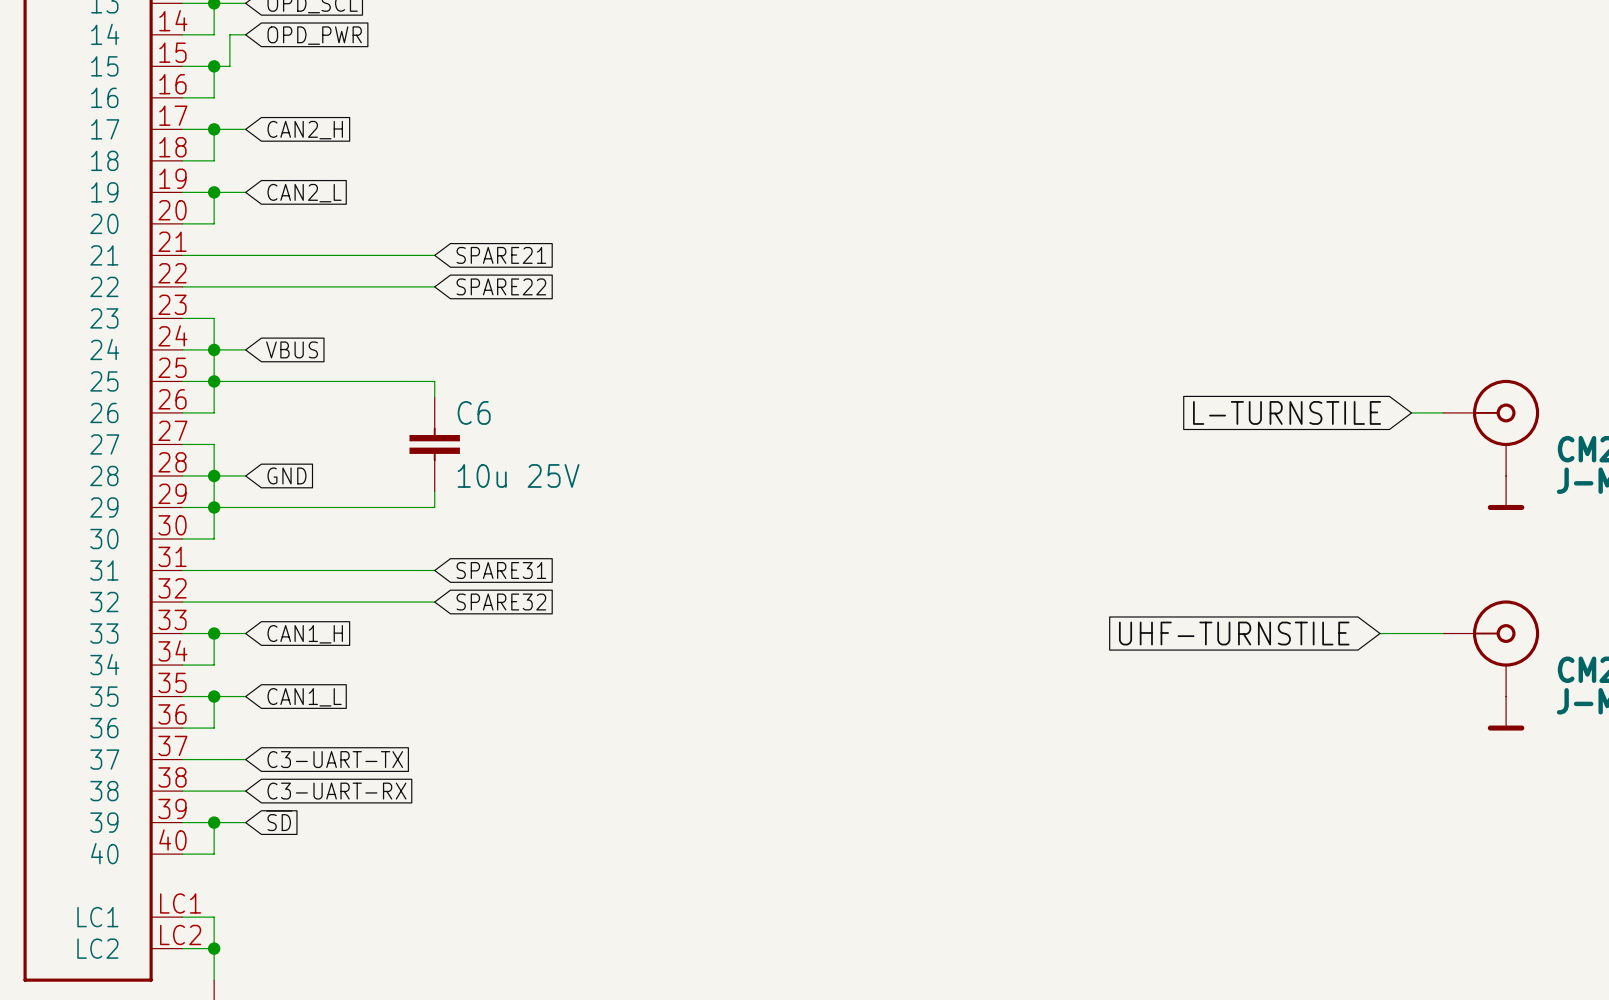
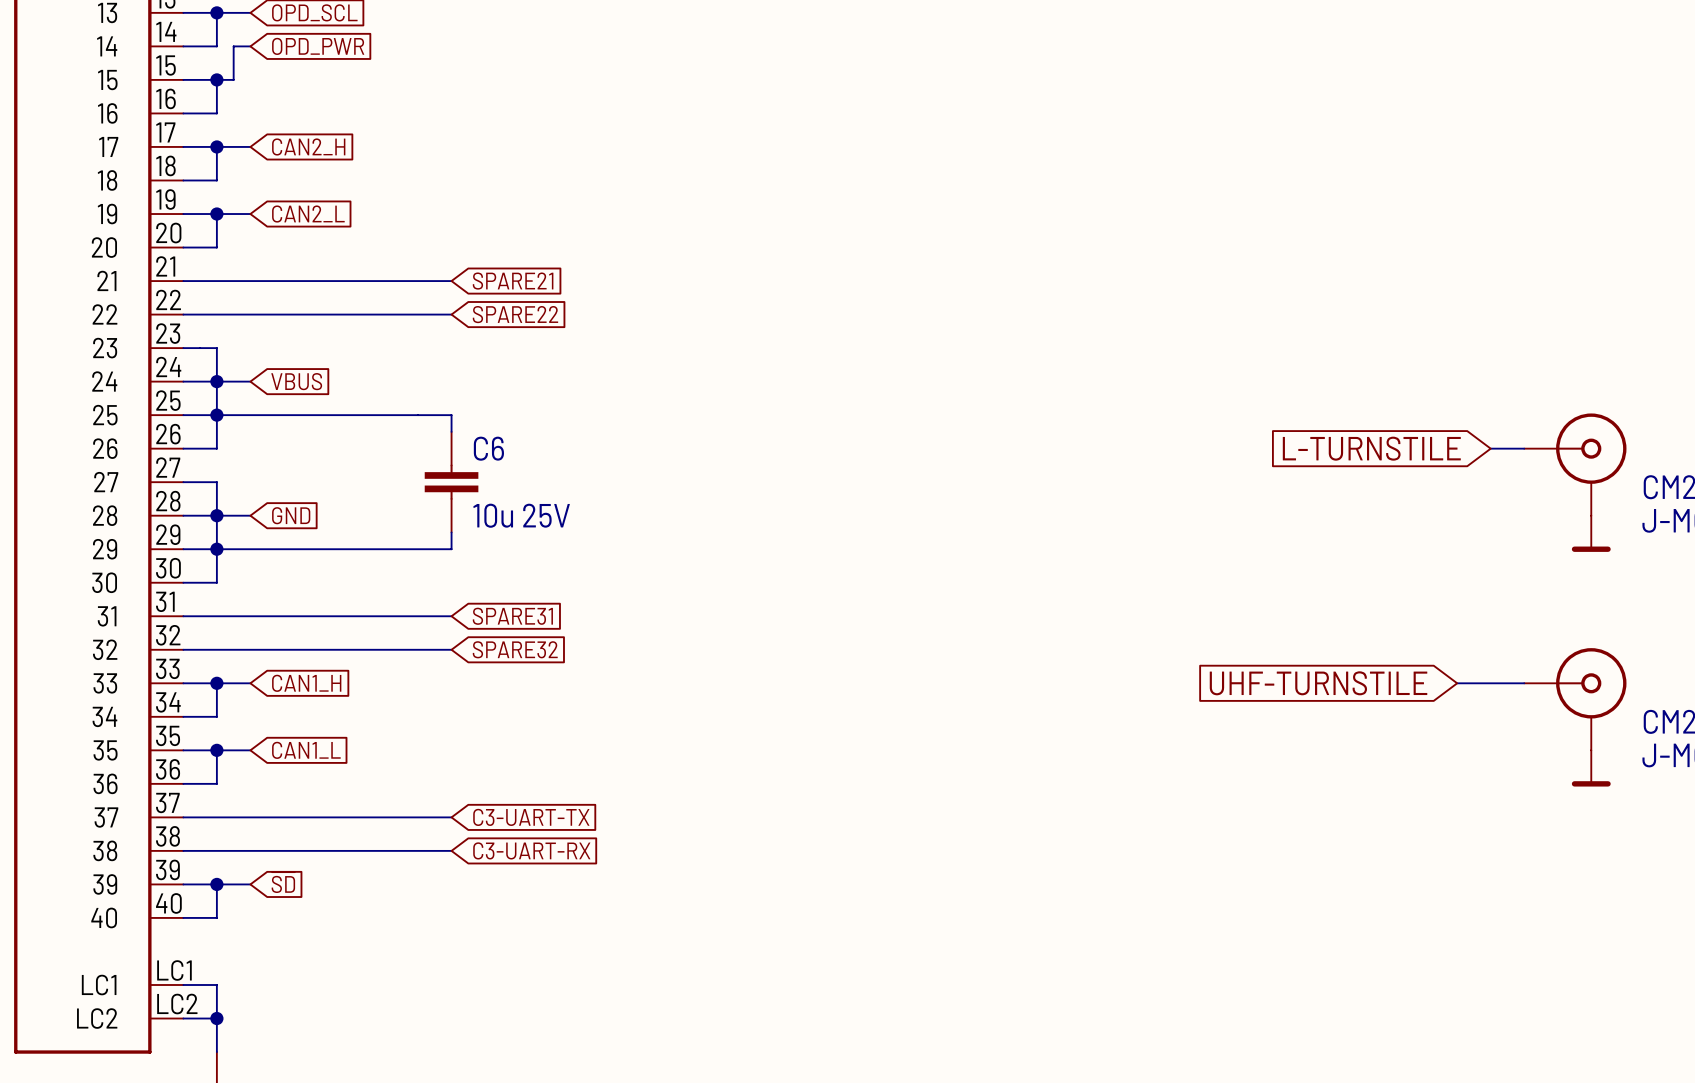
wire: none -> (250, 817) (451, 817)
global label position: C3-UART-TX (335, 759) -> C3-UART-TX (531, 817)
wire: none -> (250, 850) (451, 850)
global label position: C3-UART-RX (336, 791) -> C3-UART-RX (531, 850)

